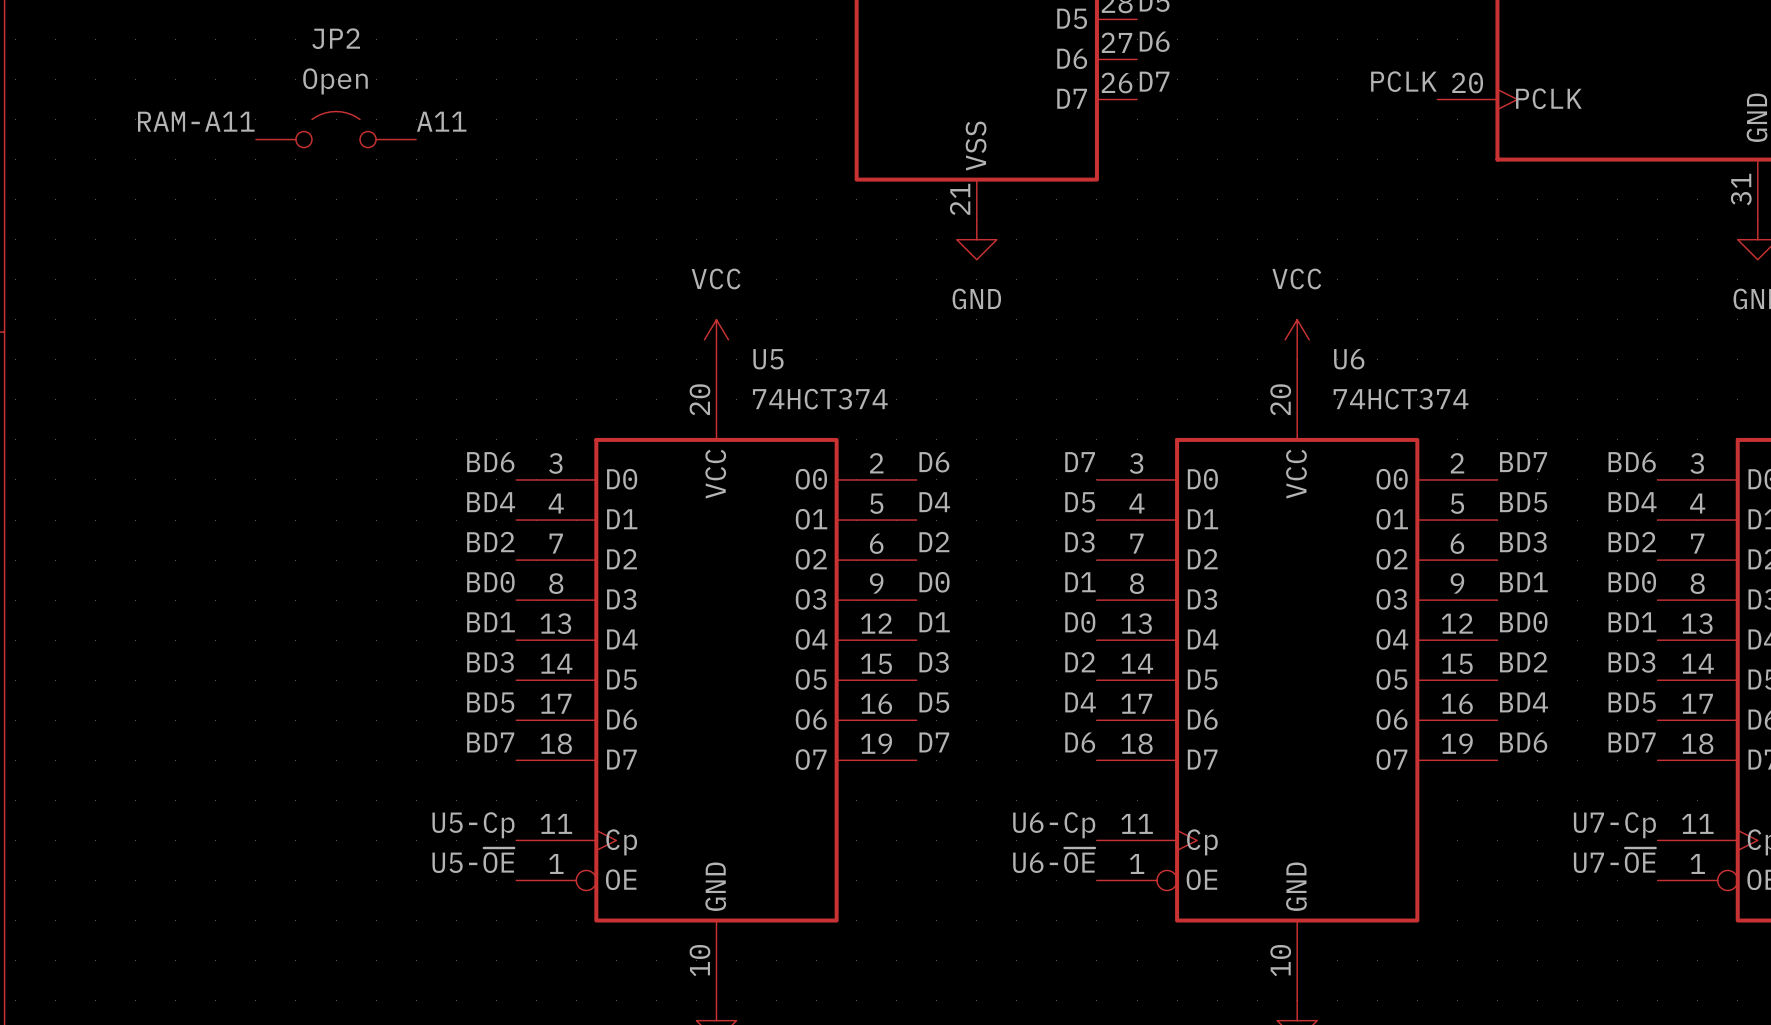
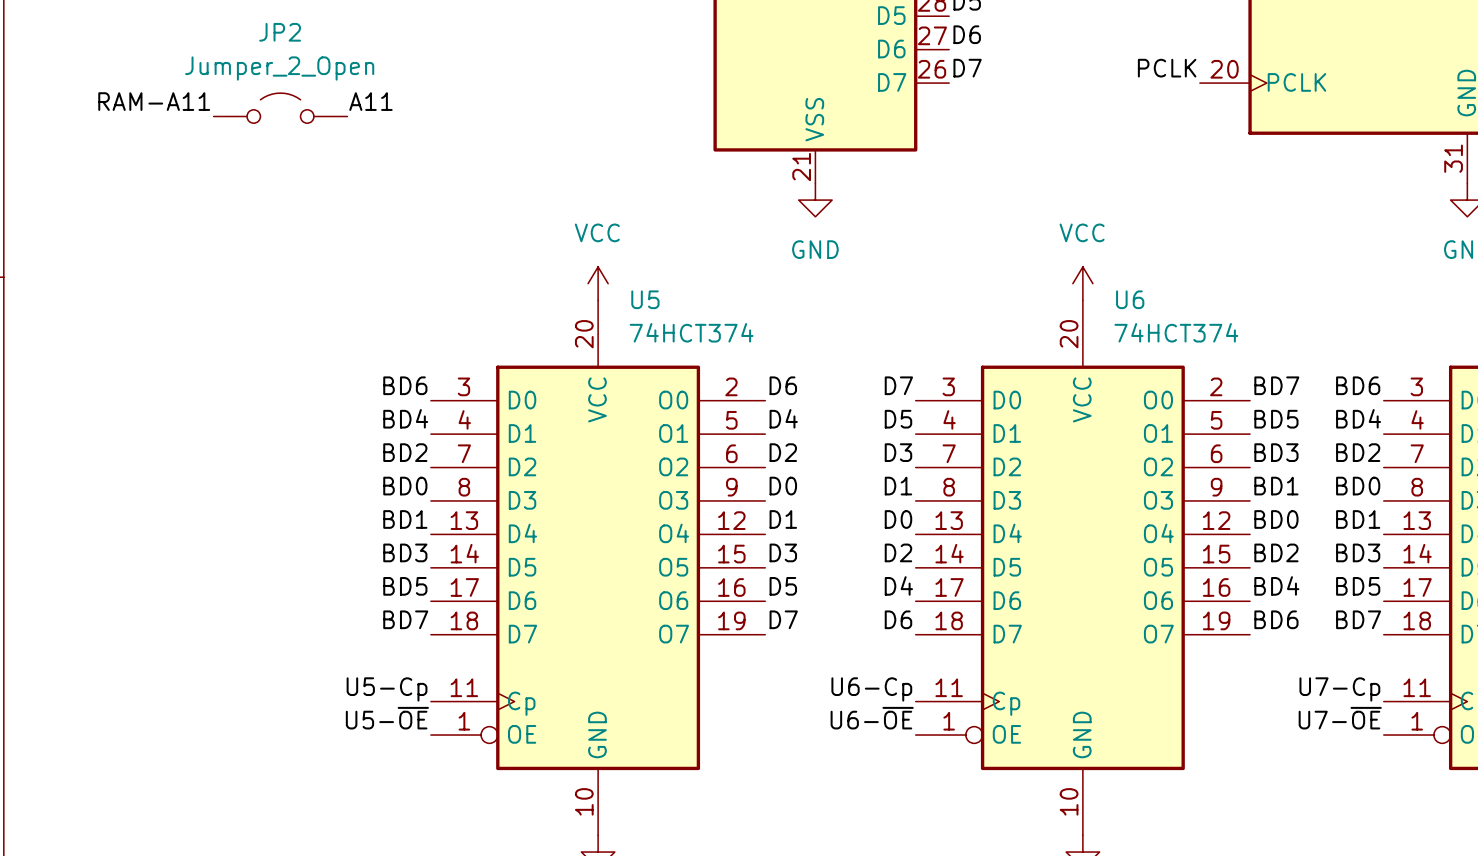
JP2 value: Open (335, 81) -> Jumper_2_Open (279, 68)

